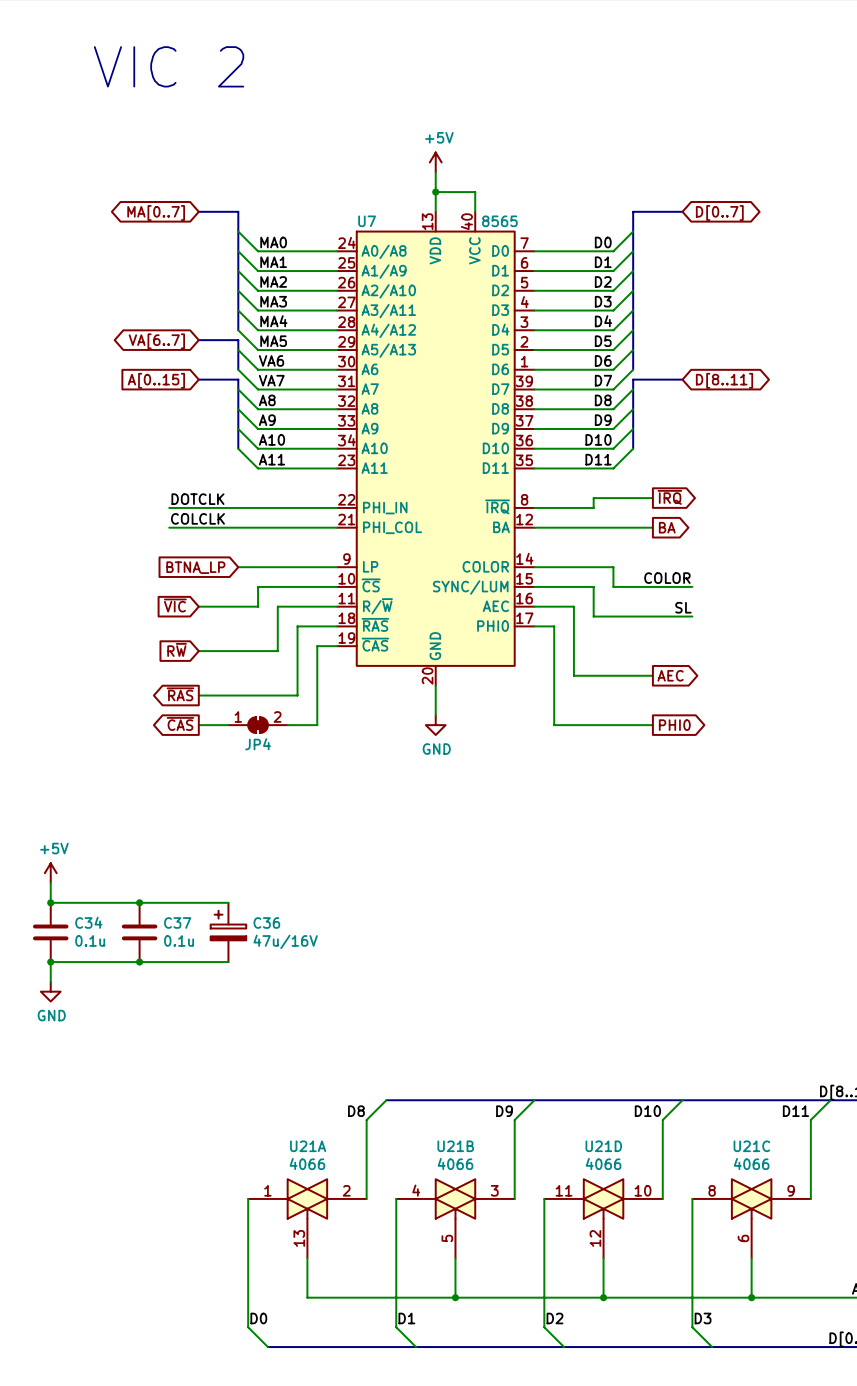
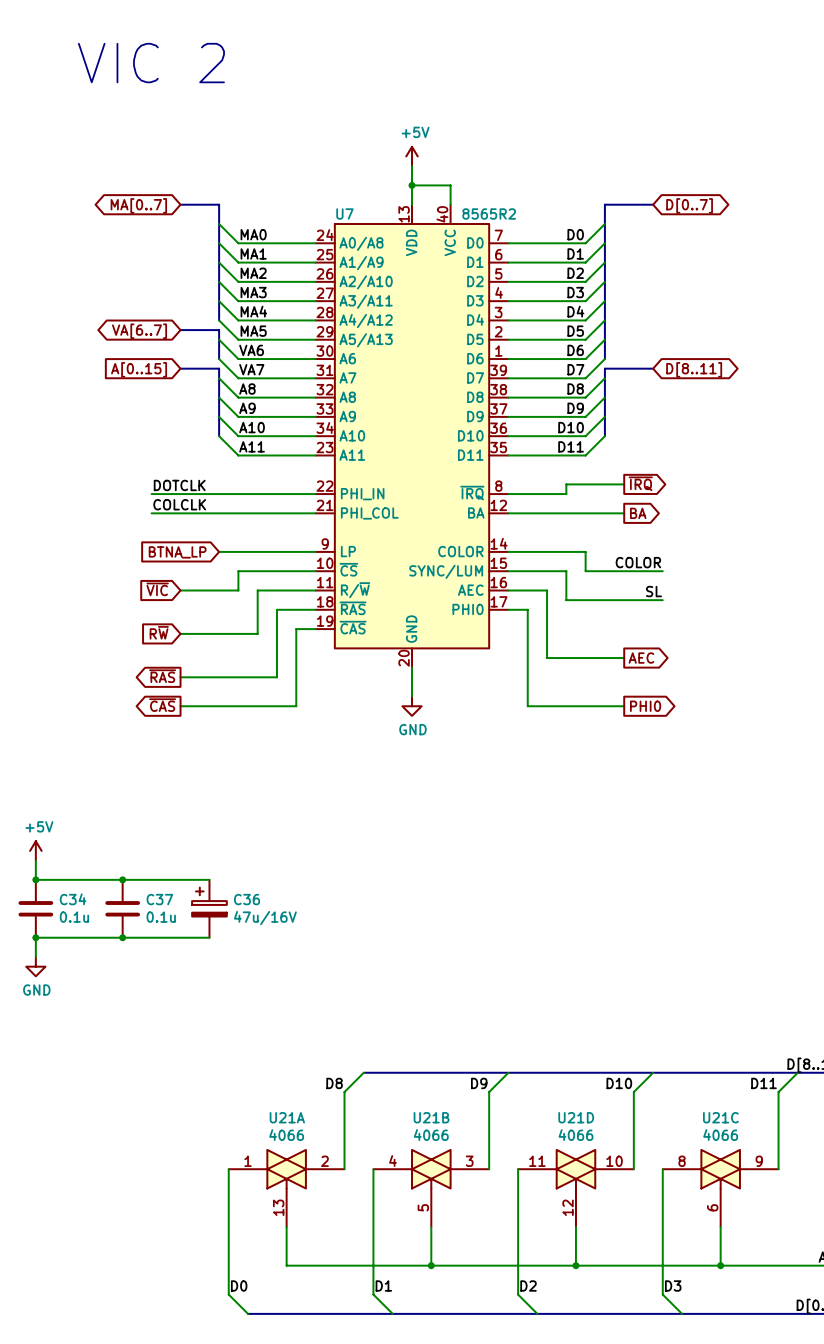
U7 value: 8565 (499, 221) -> 8565R2 (489, 213)
JP4: (258, 725) -> none

